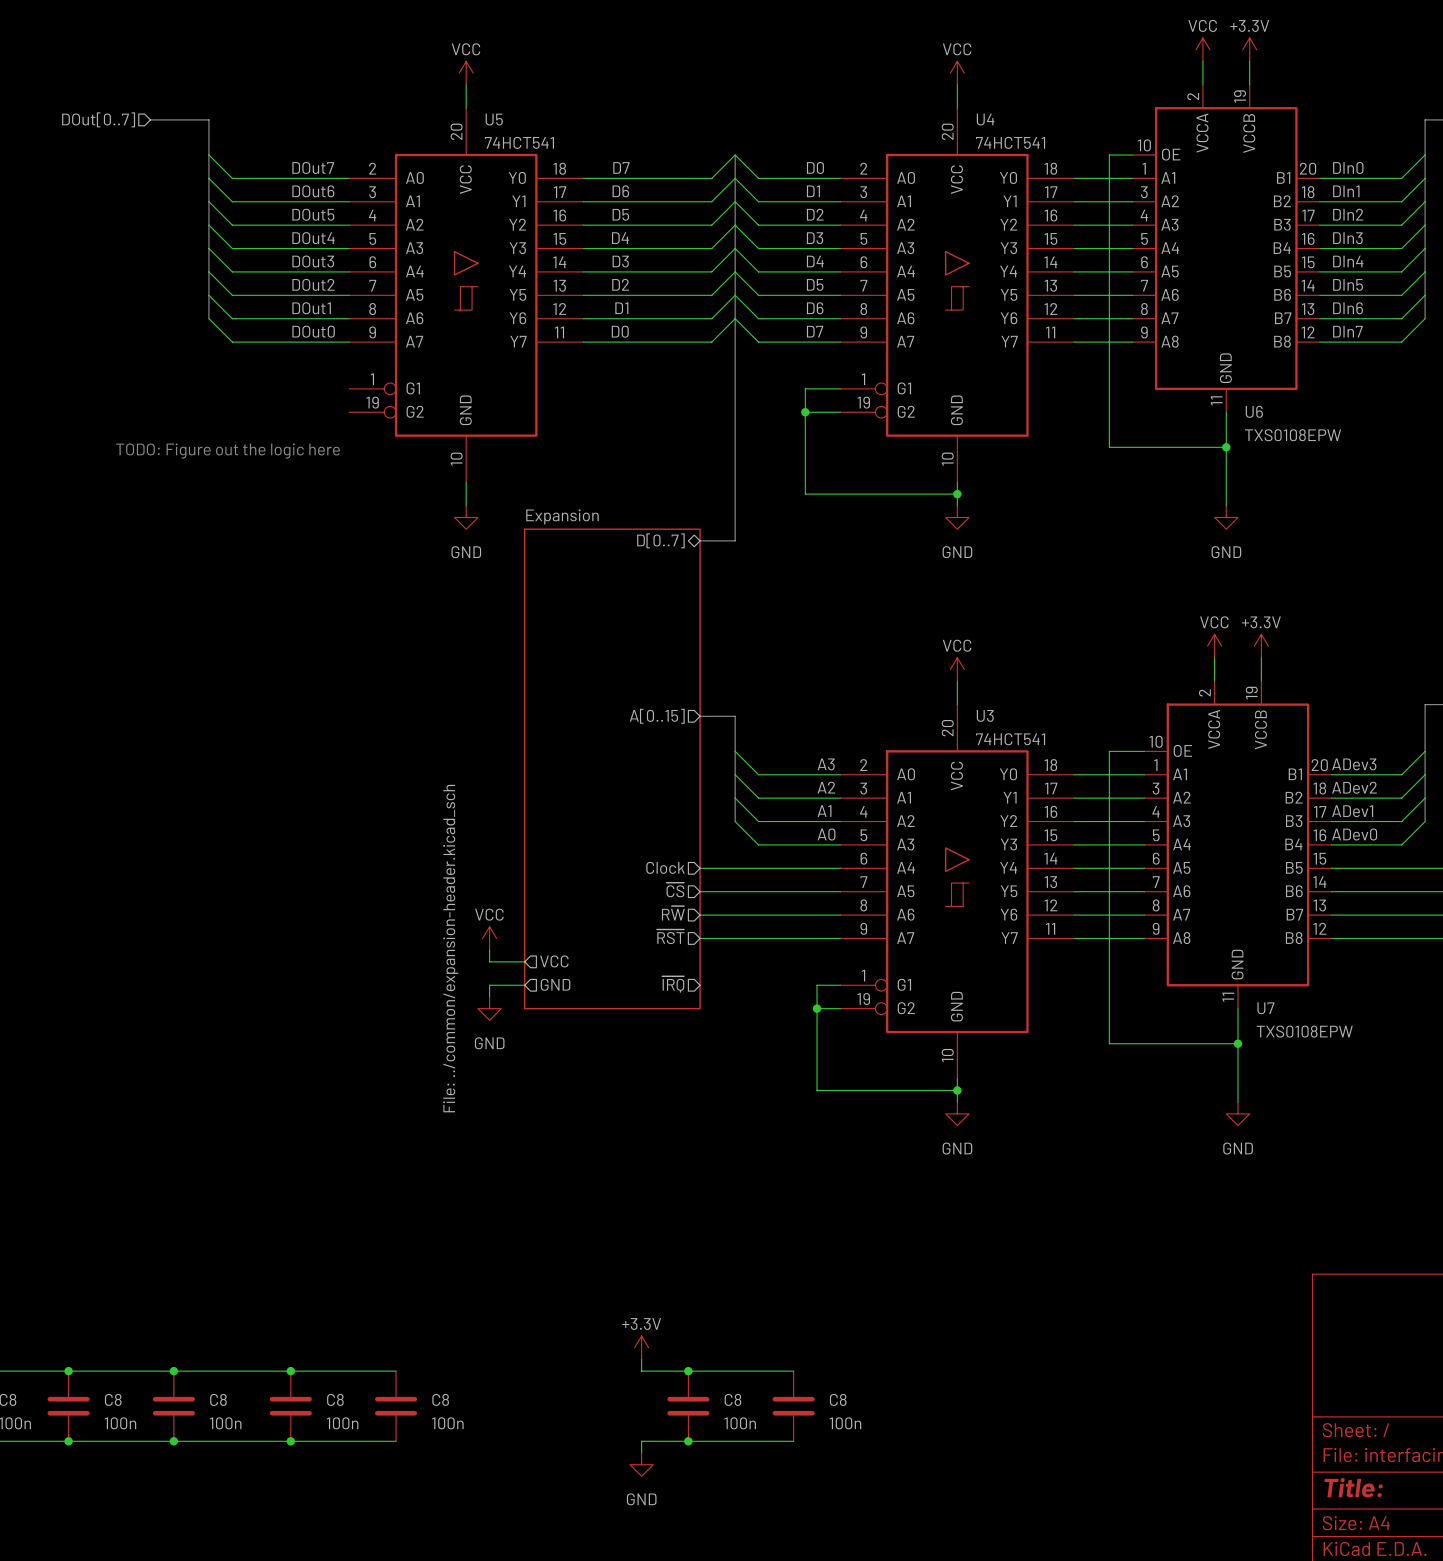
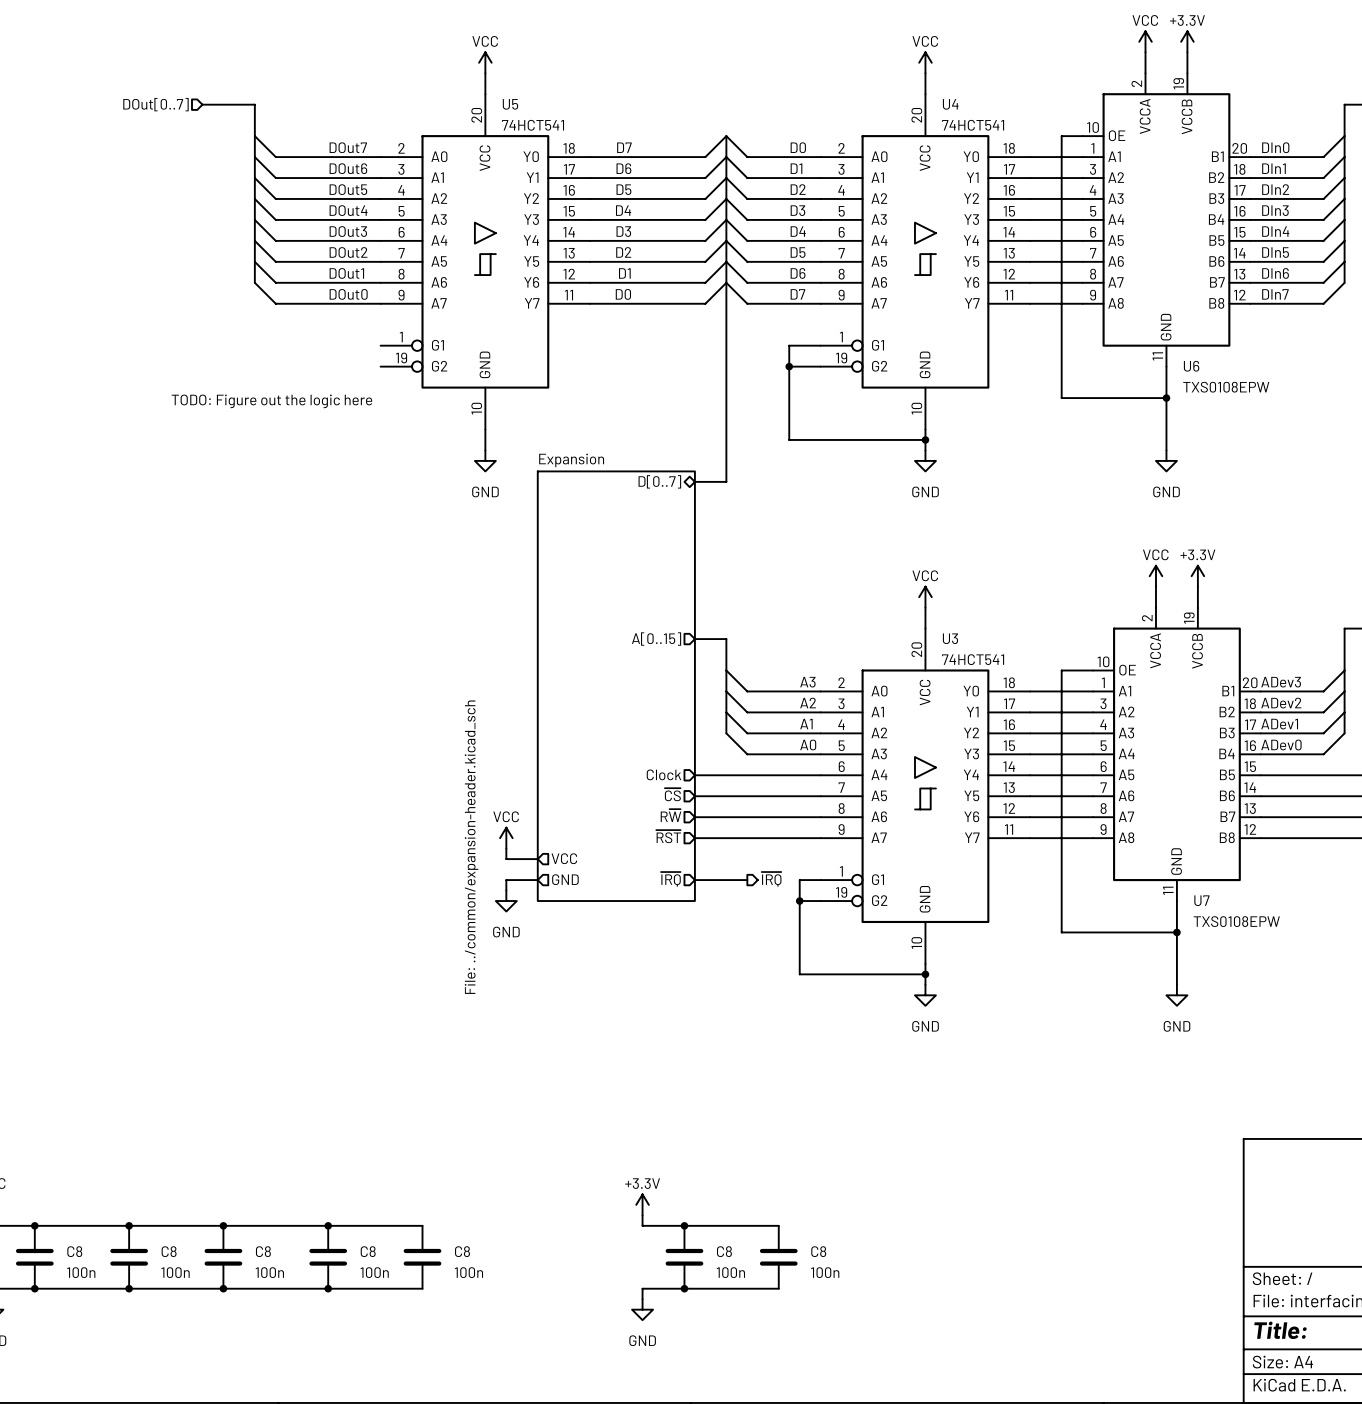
hierarchical label: none -> ~{IRQ} (771, 879)
wire: none -> (694, 880) (747, 880)

